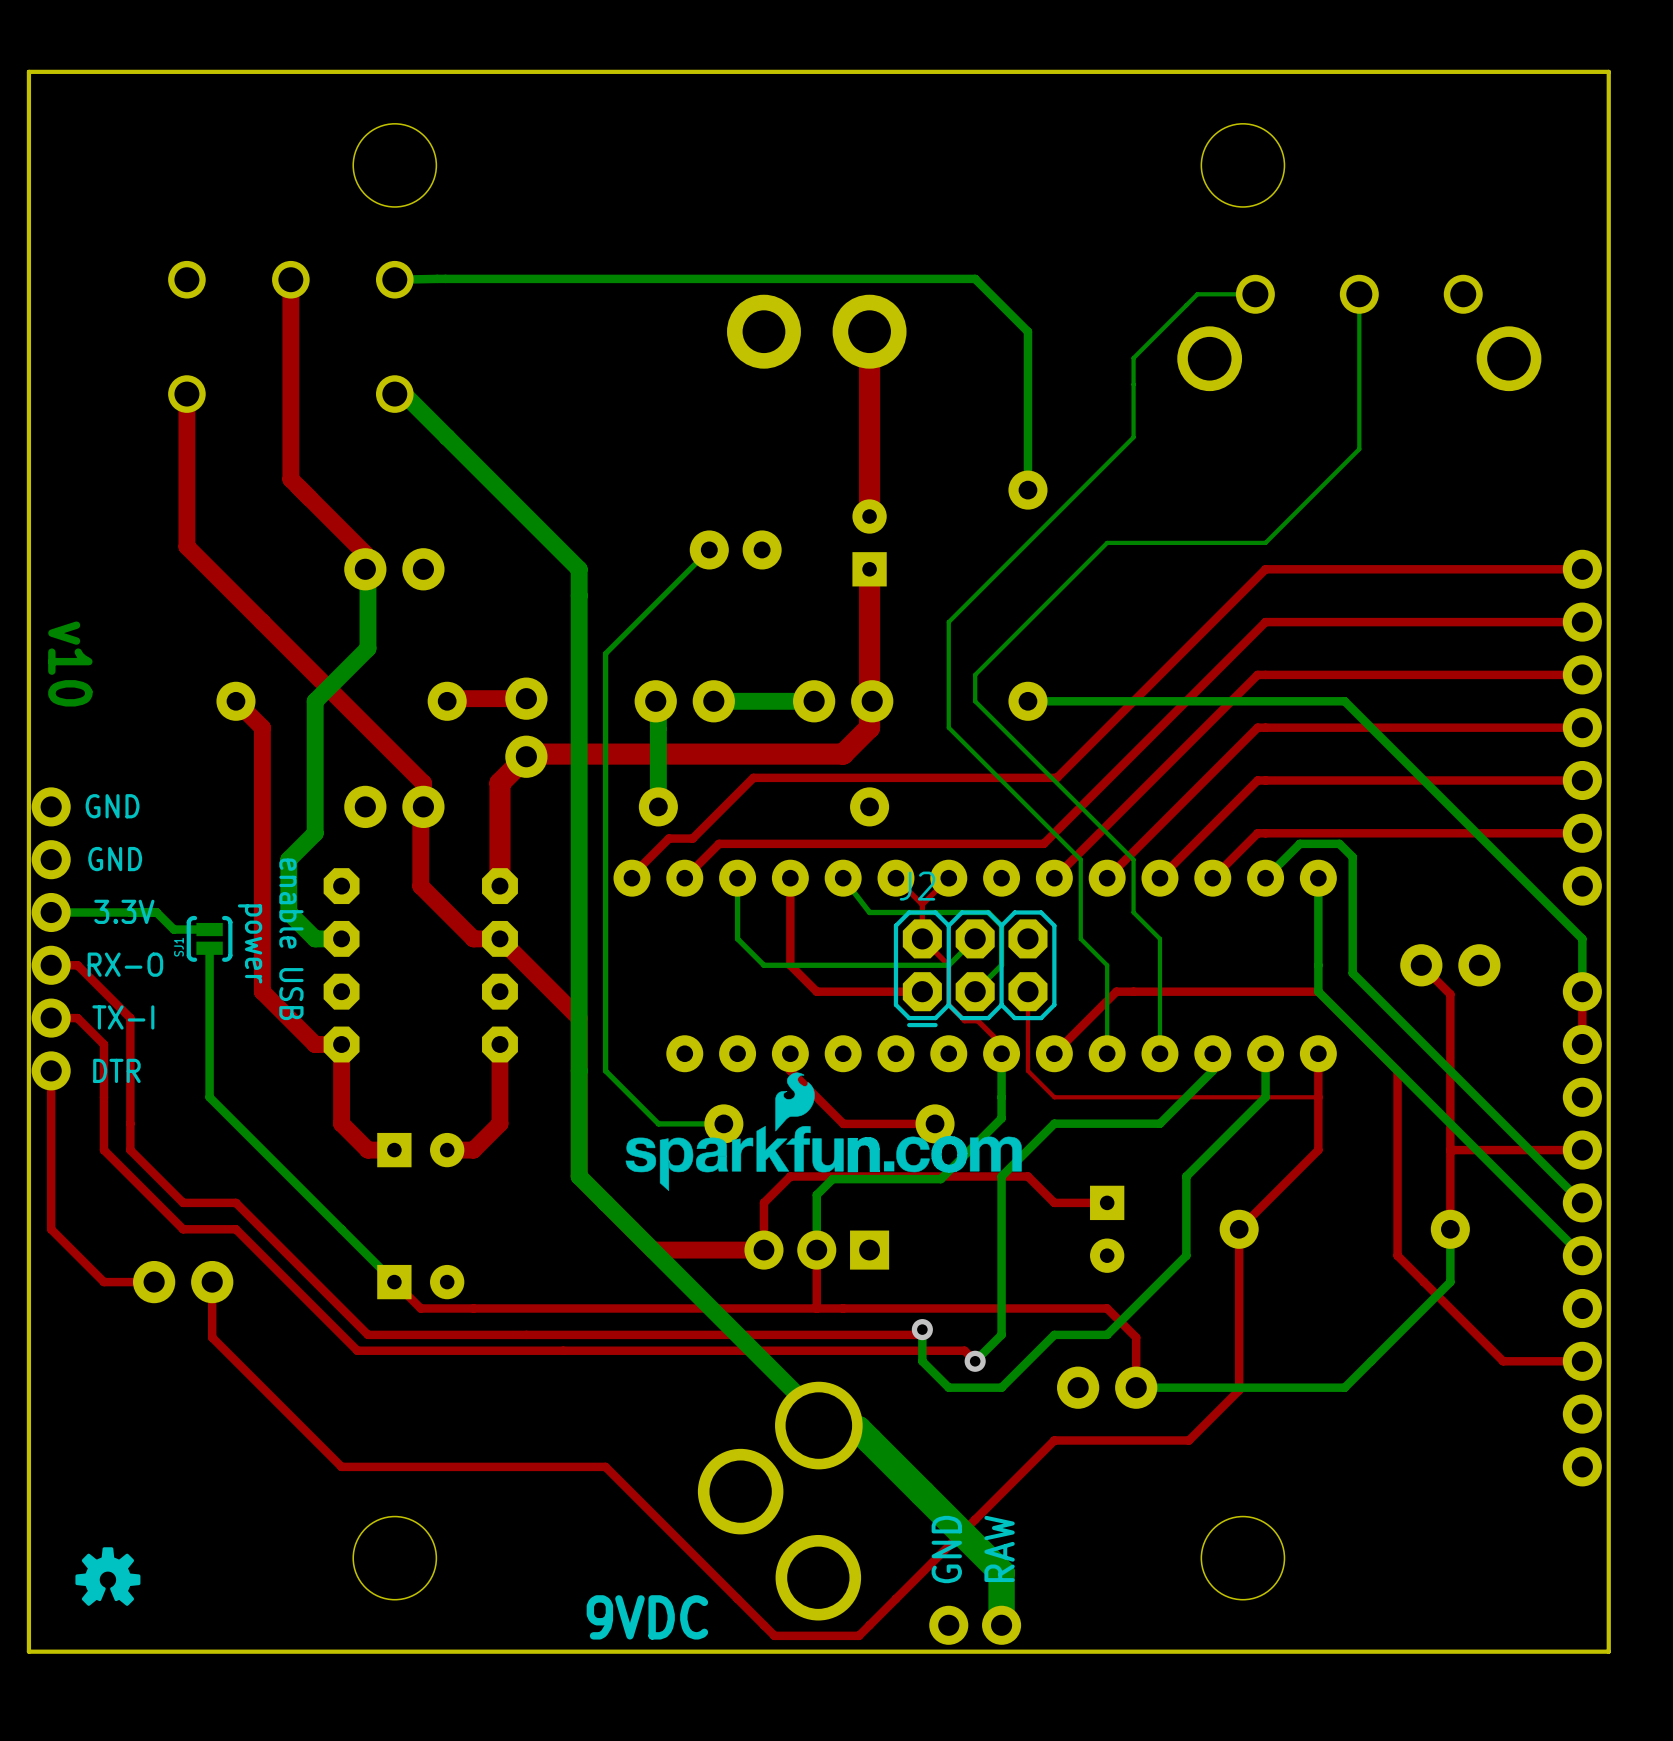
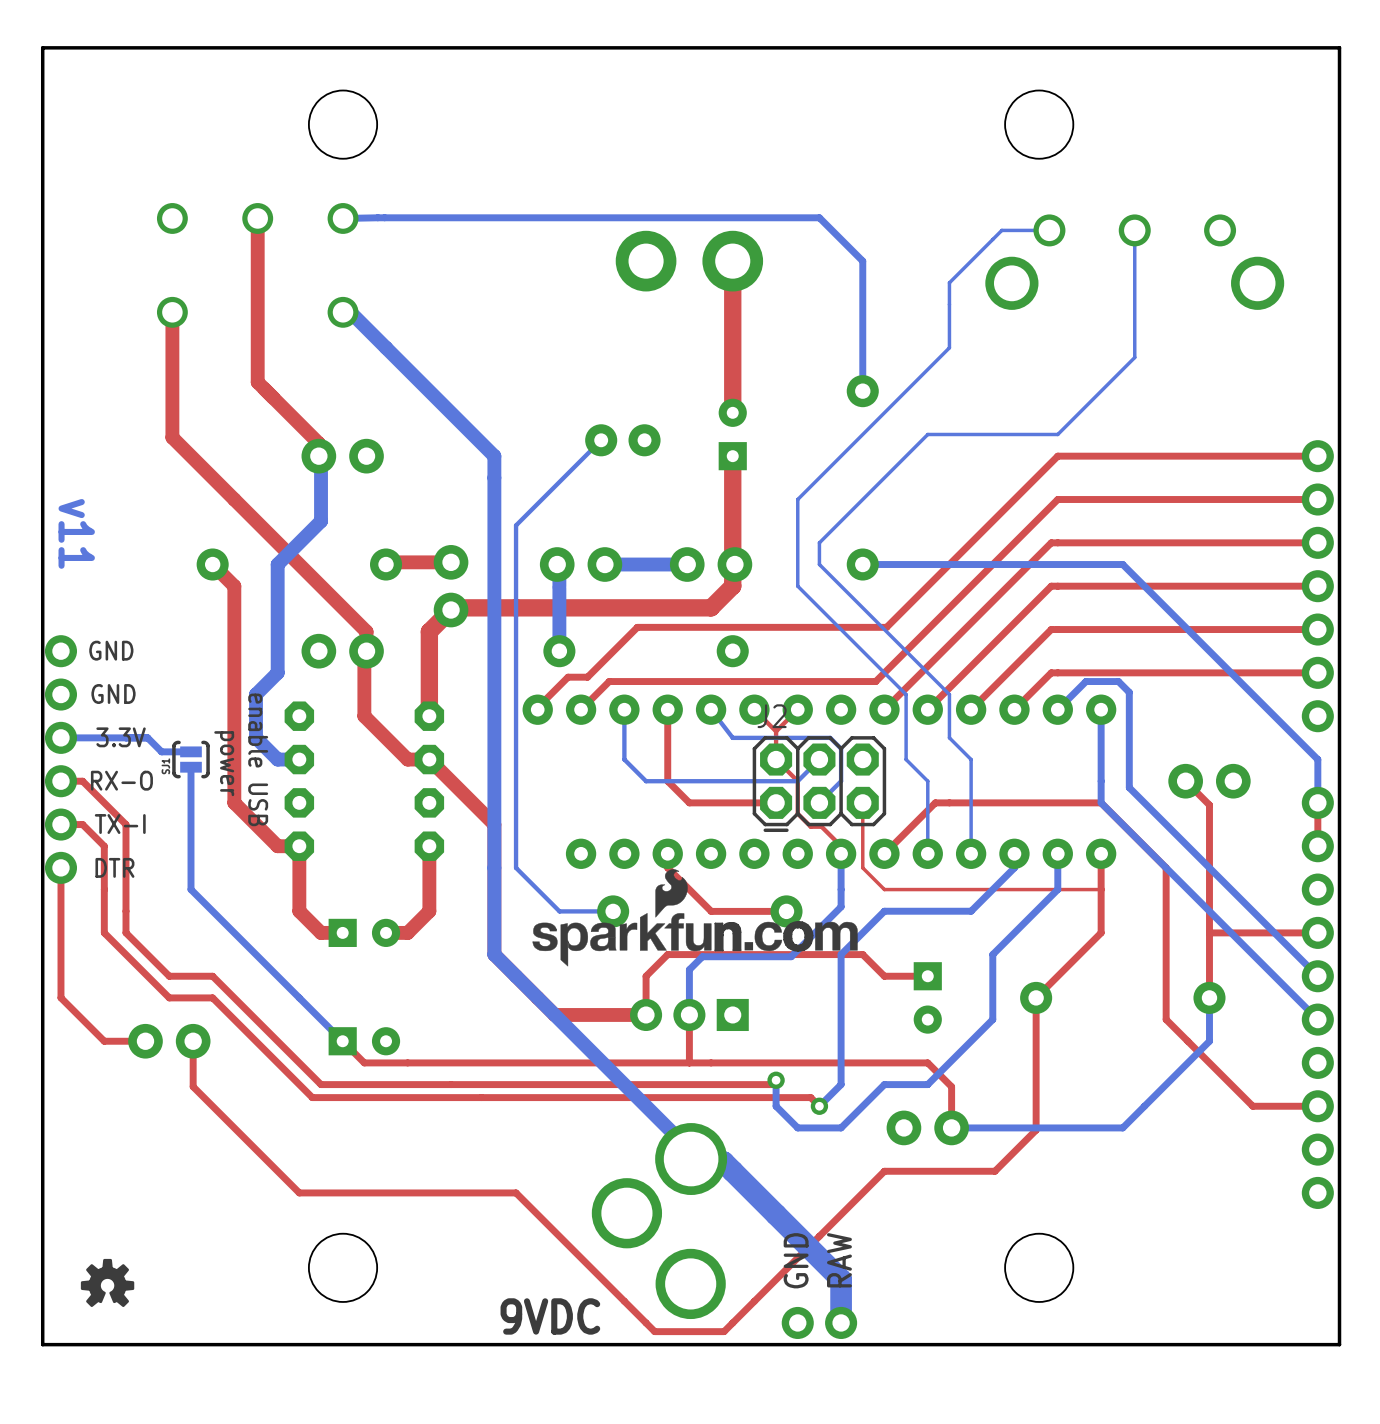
text: v10 (70, 664) -> v11 (76, 533)

